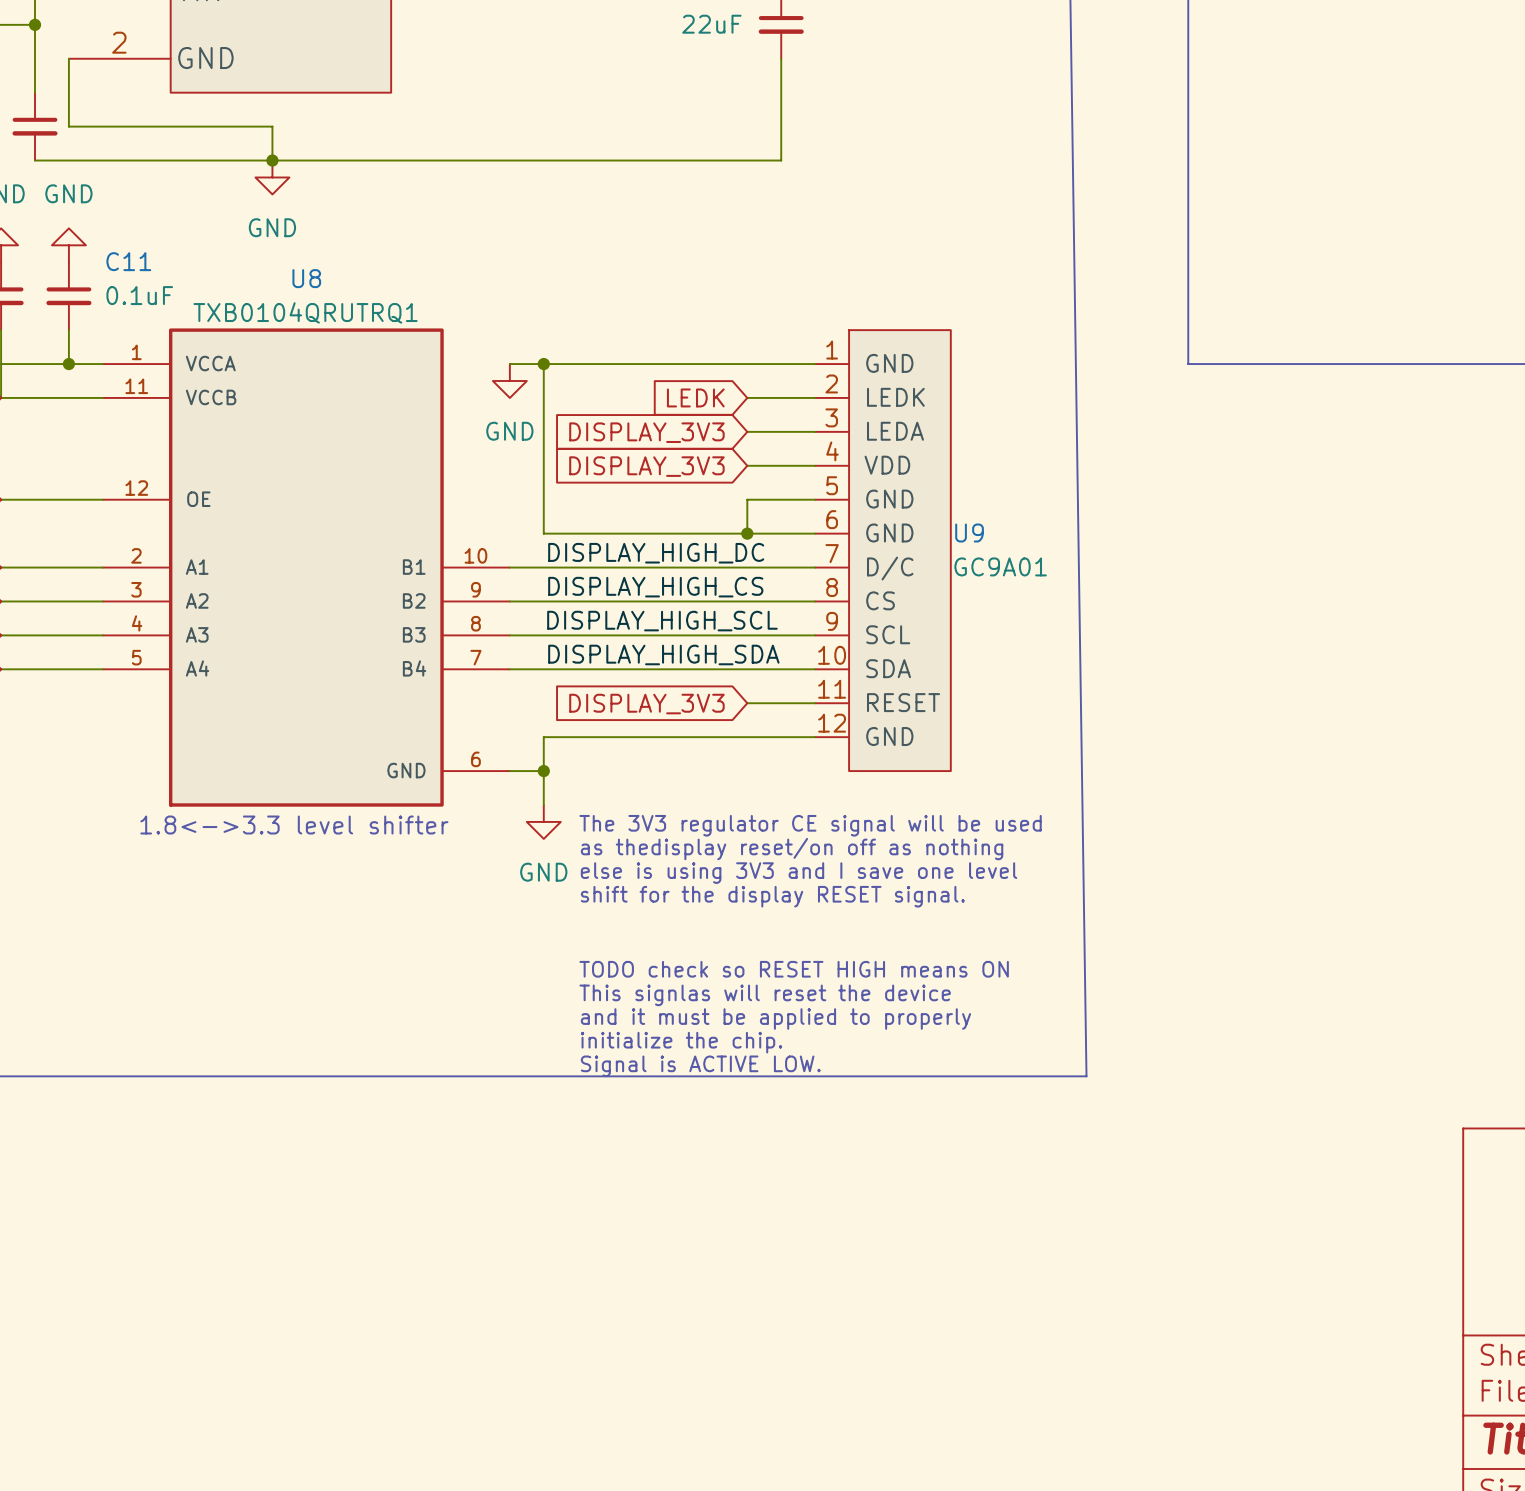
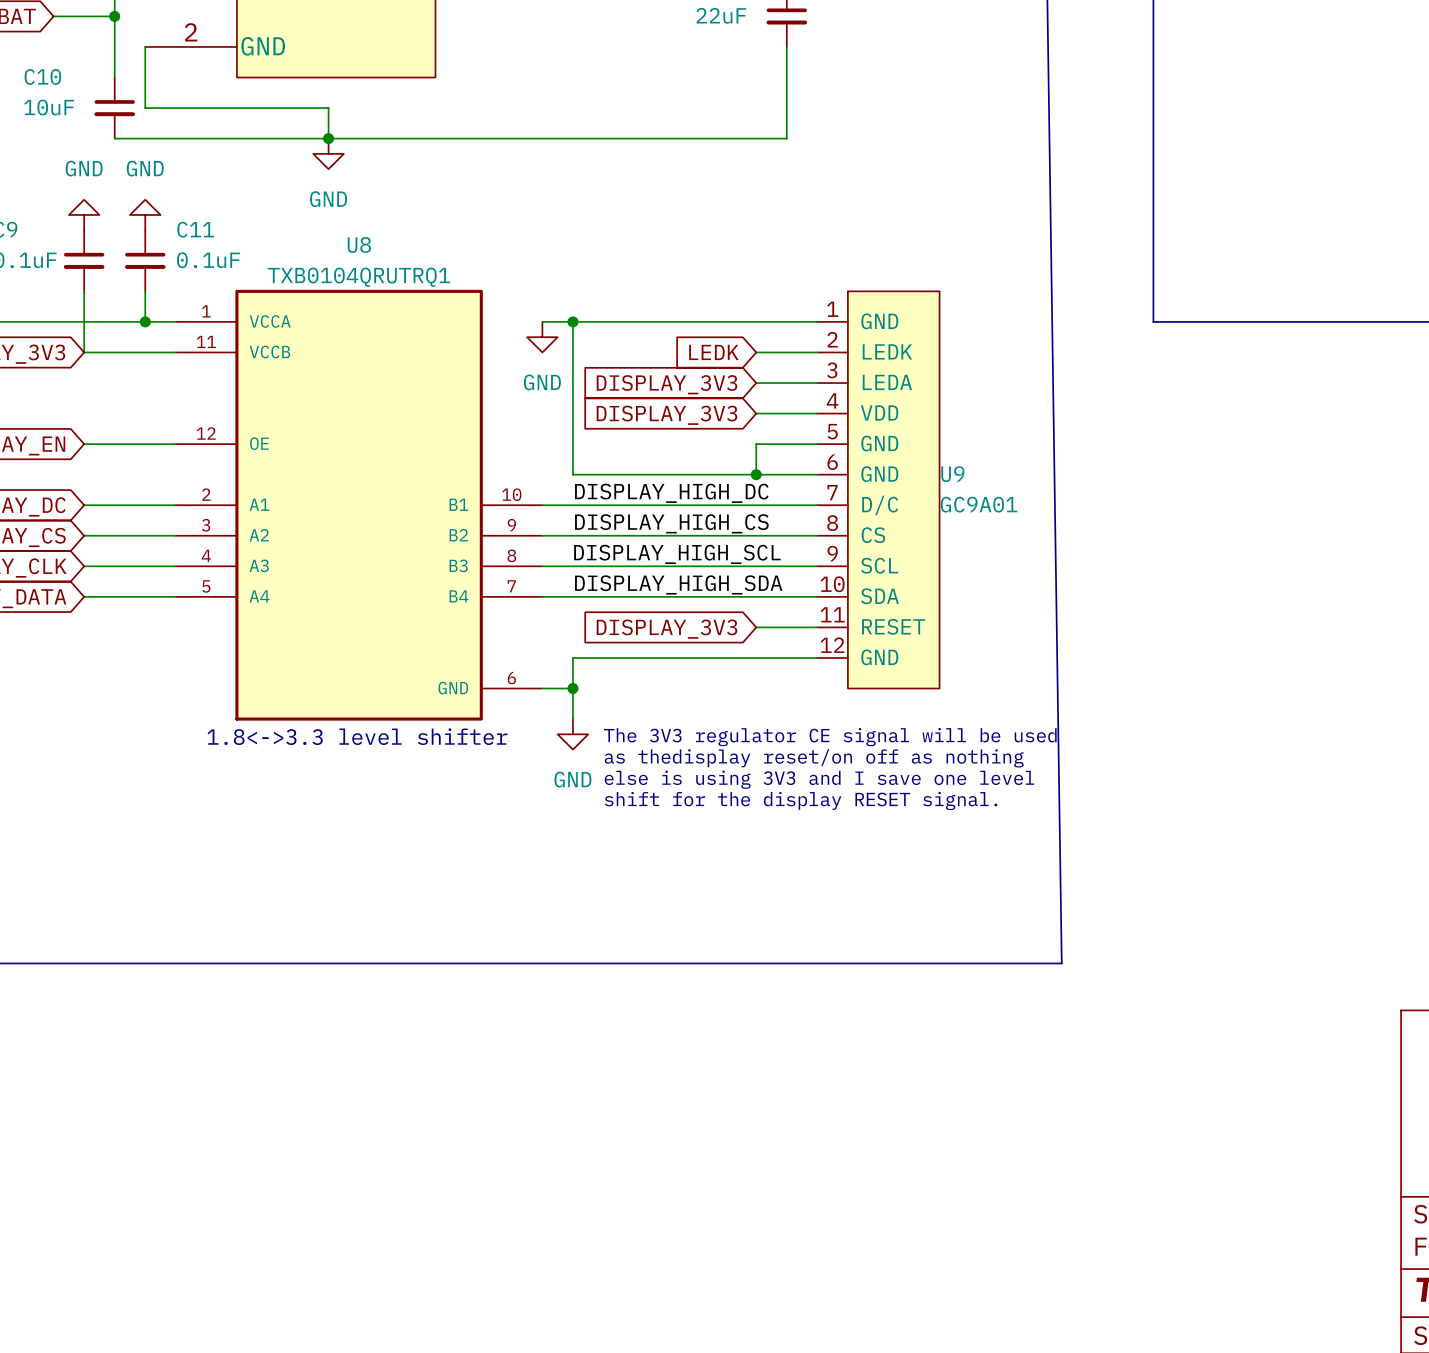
text: TODO check so RESET HIGH means ON (794, 969) -> none
text: This signlas will reset the device (765, 995) -> none
text: and it must be applied to properly (775, 1019) -> none
text: initialize the chip. (681, 1042) -> none
text: Signal is ACTIVE LOW. (700, 1066) -> none

